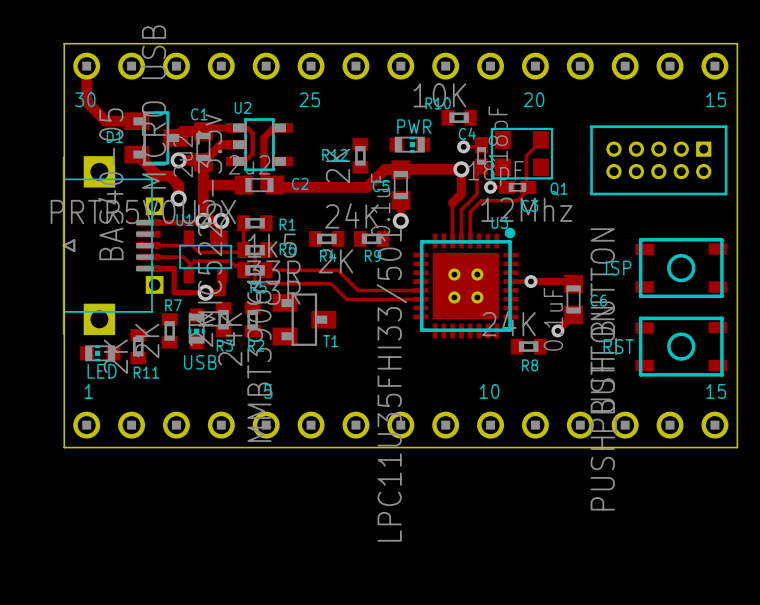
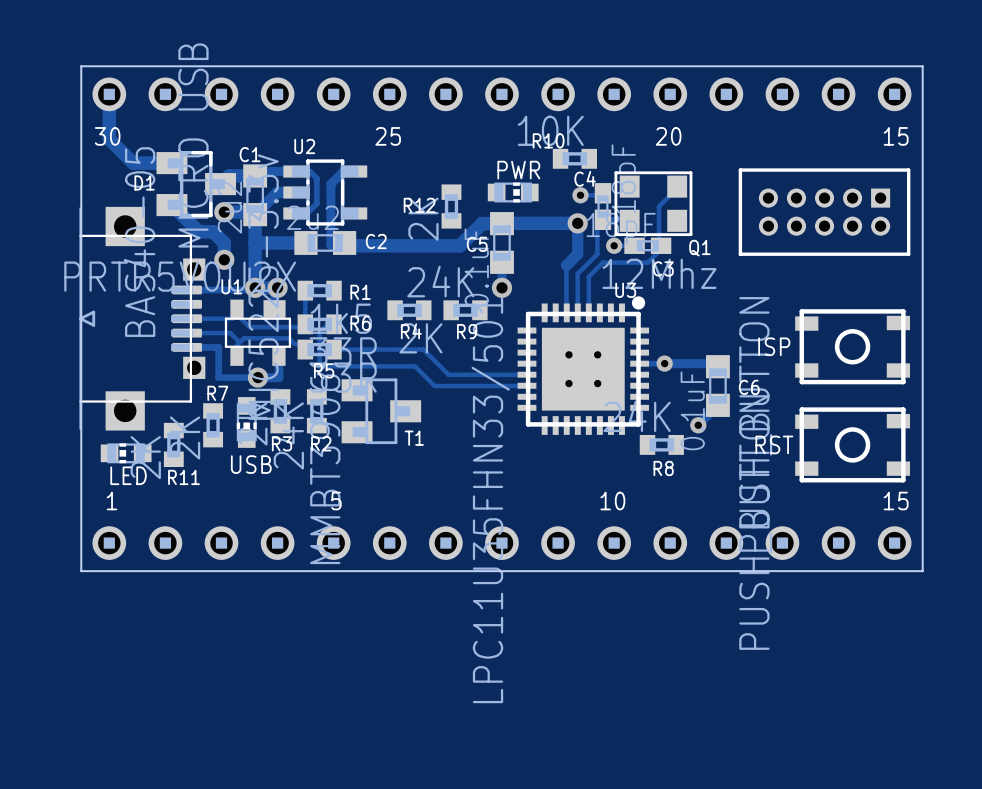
U3 value: LPC11U35FHI33/501 (391, 384) -> LPC11U35FHN33/501 (490, 500)

